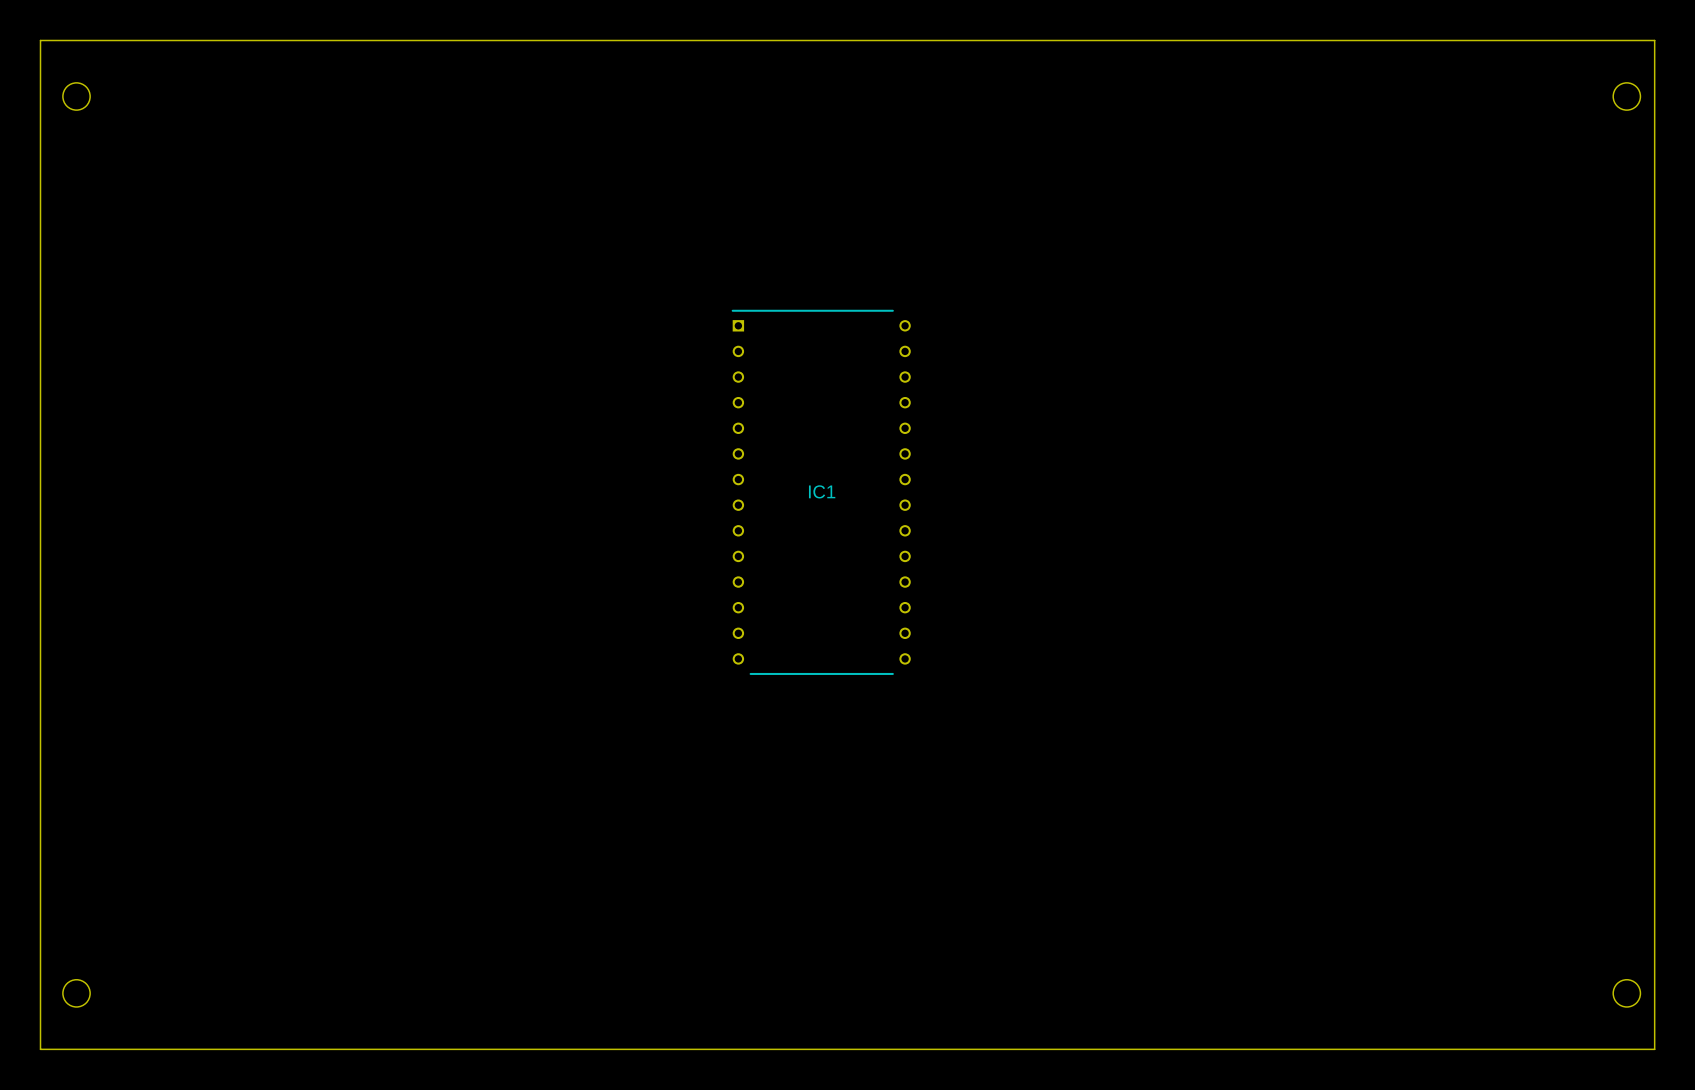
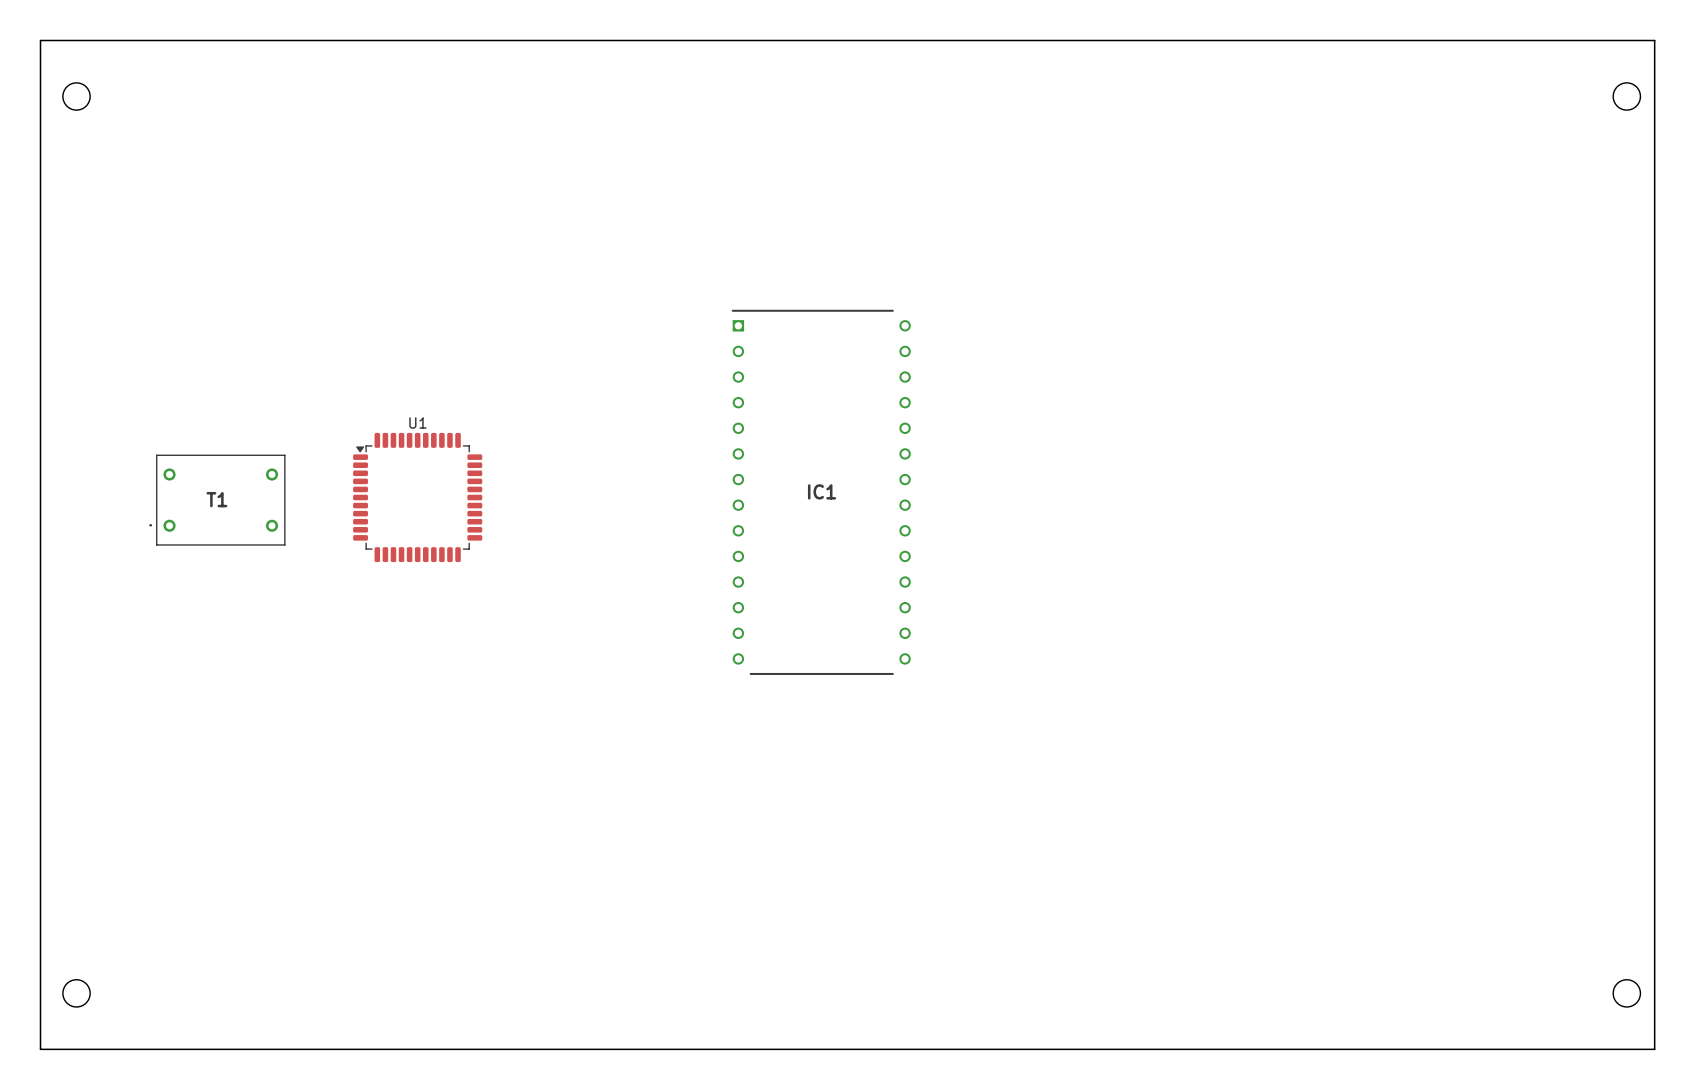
U1: none -> (417, 497)
T1: none -> (217, 500)

